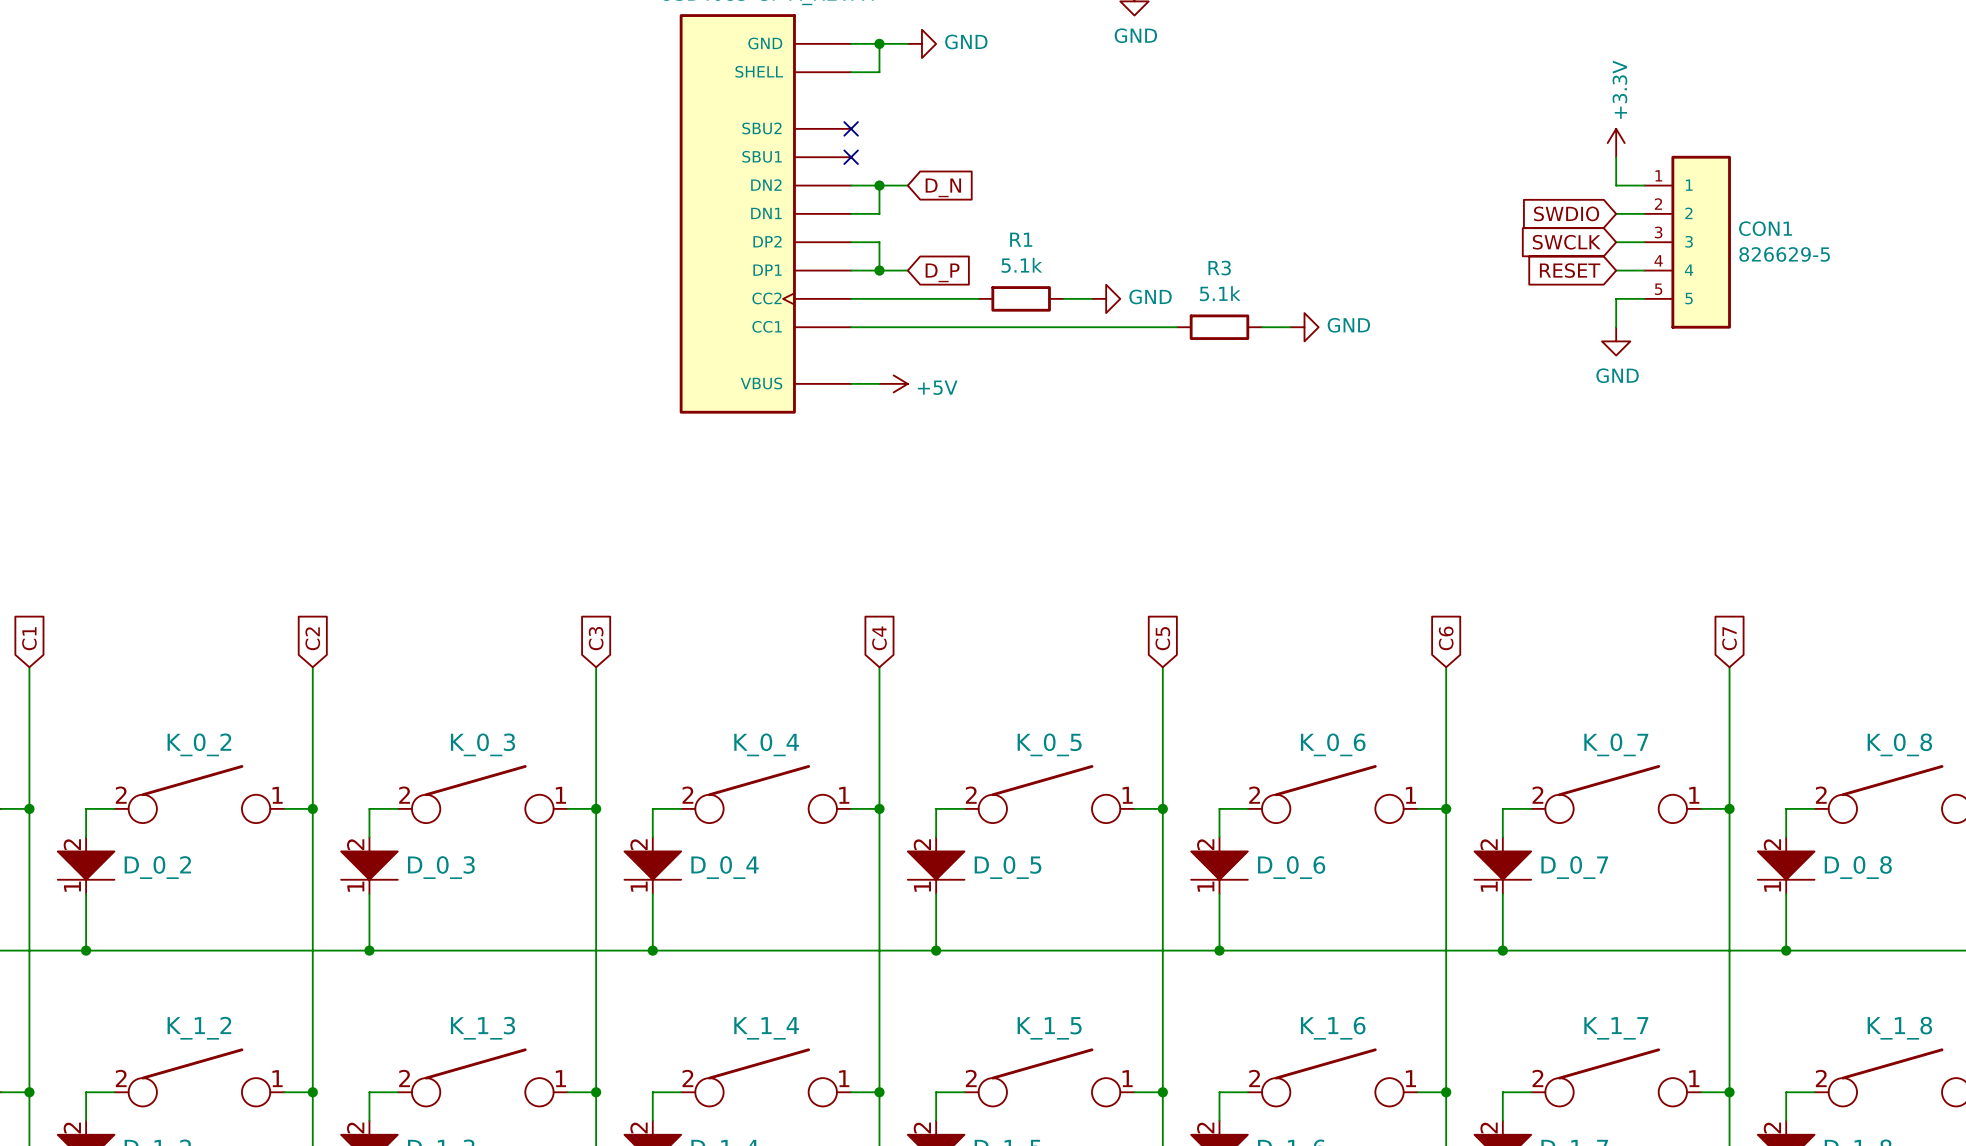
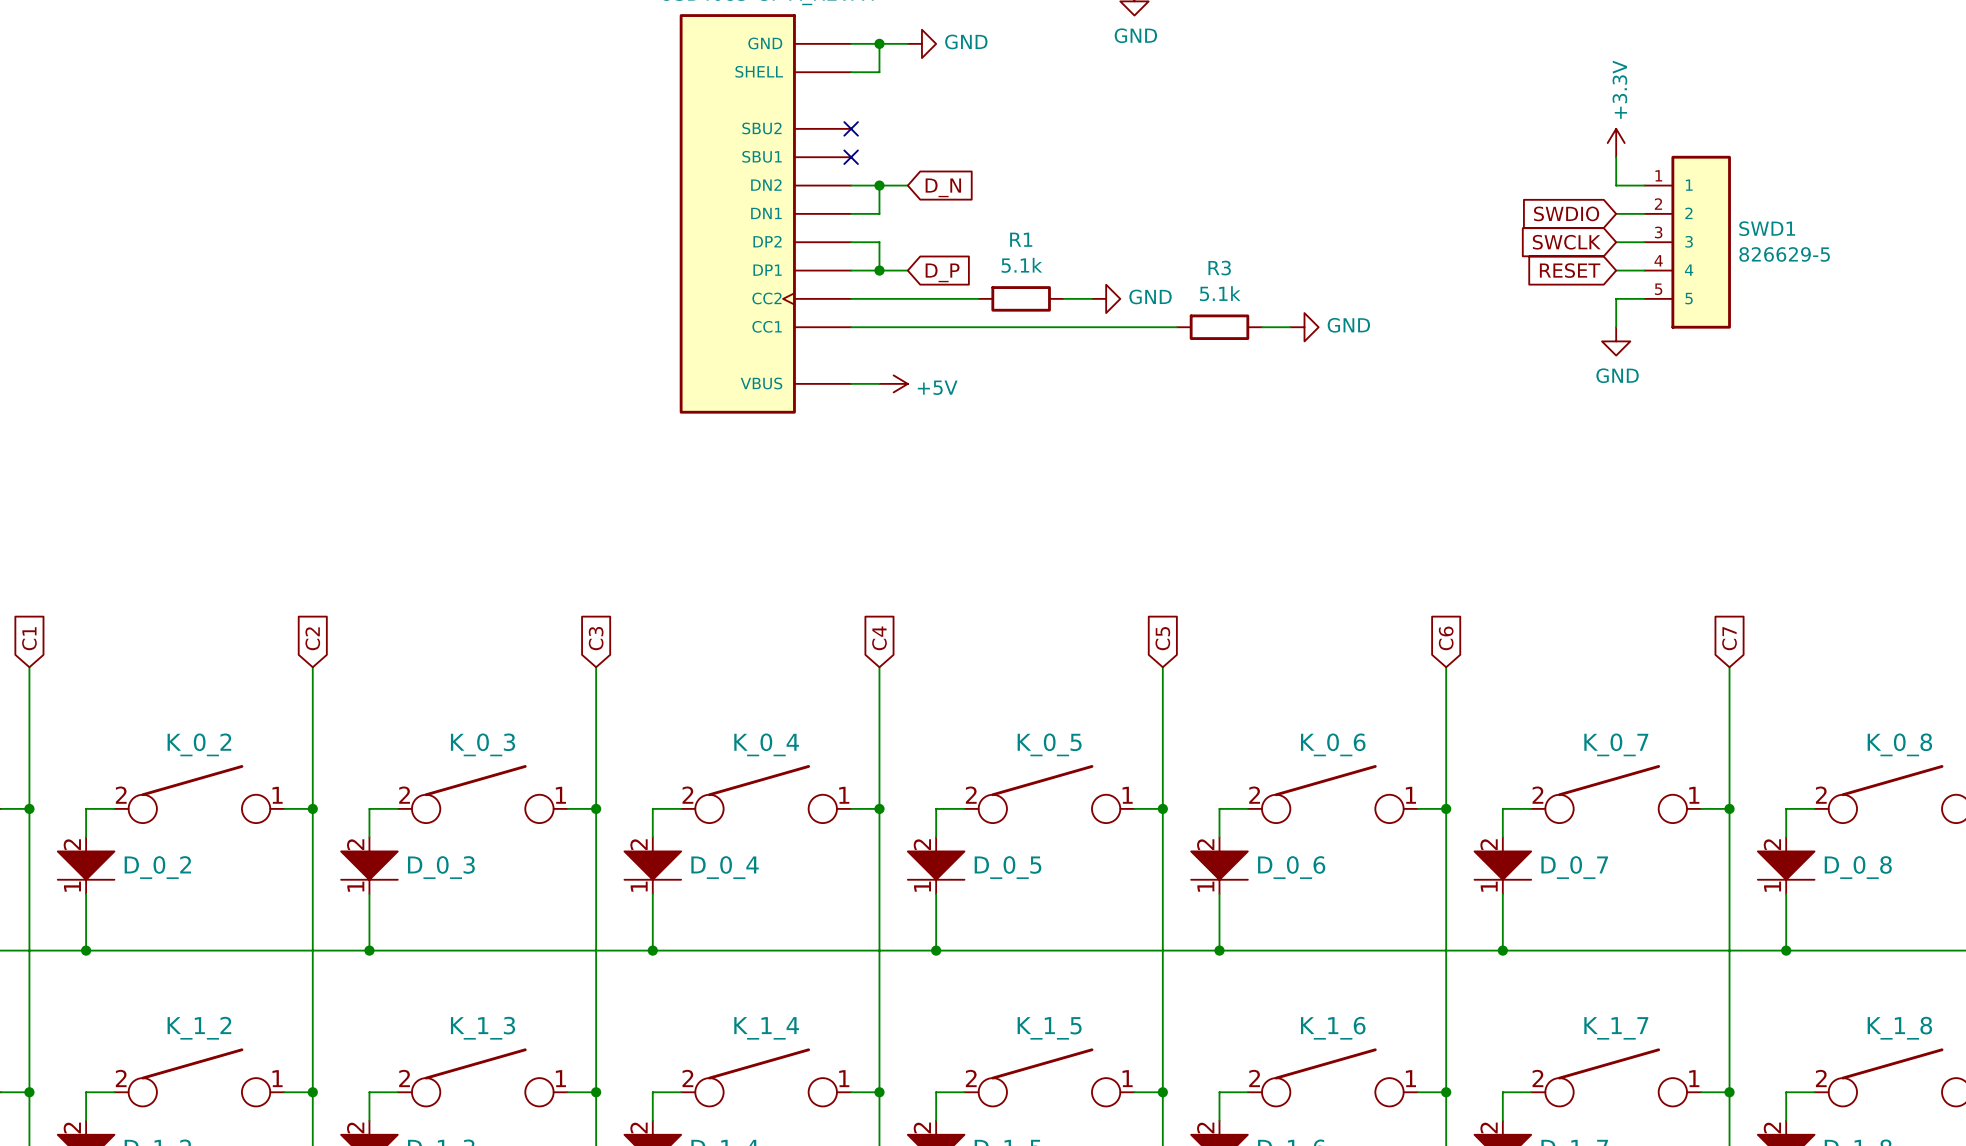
CON1 name: CON1 (1765, 228) -> SWD1 (1767, 228)

